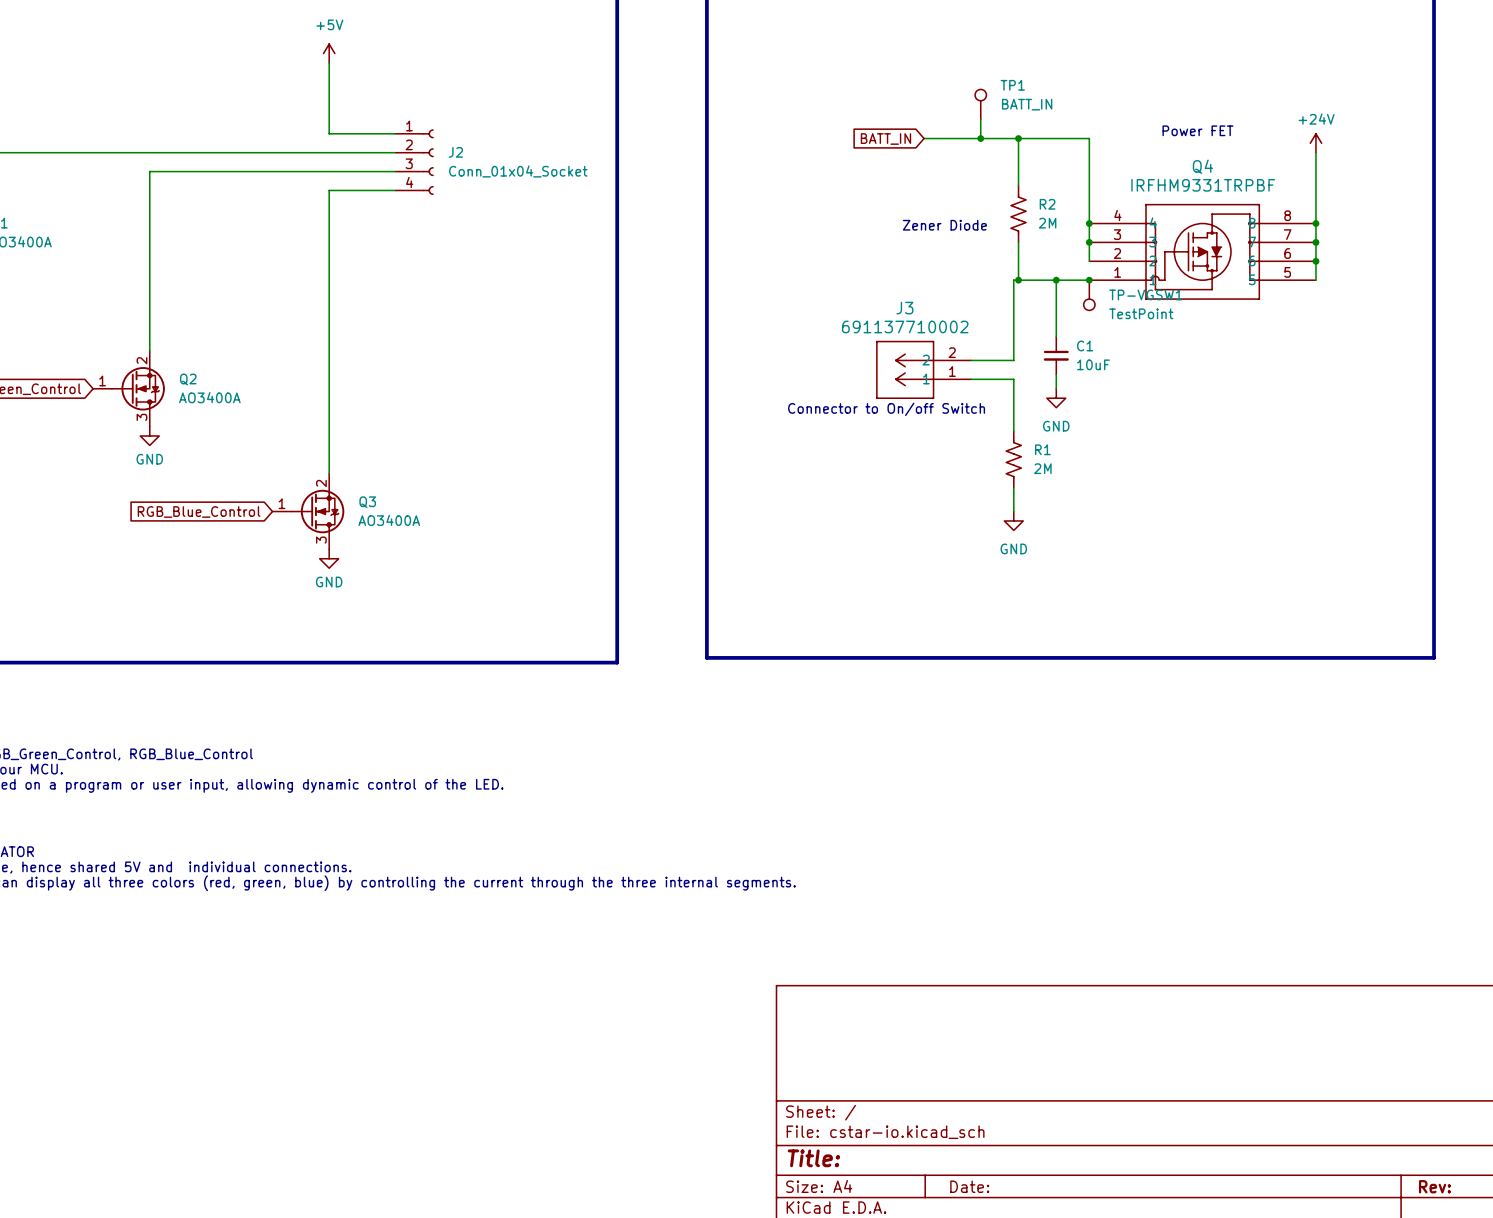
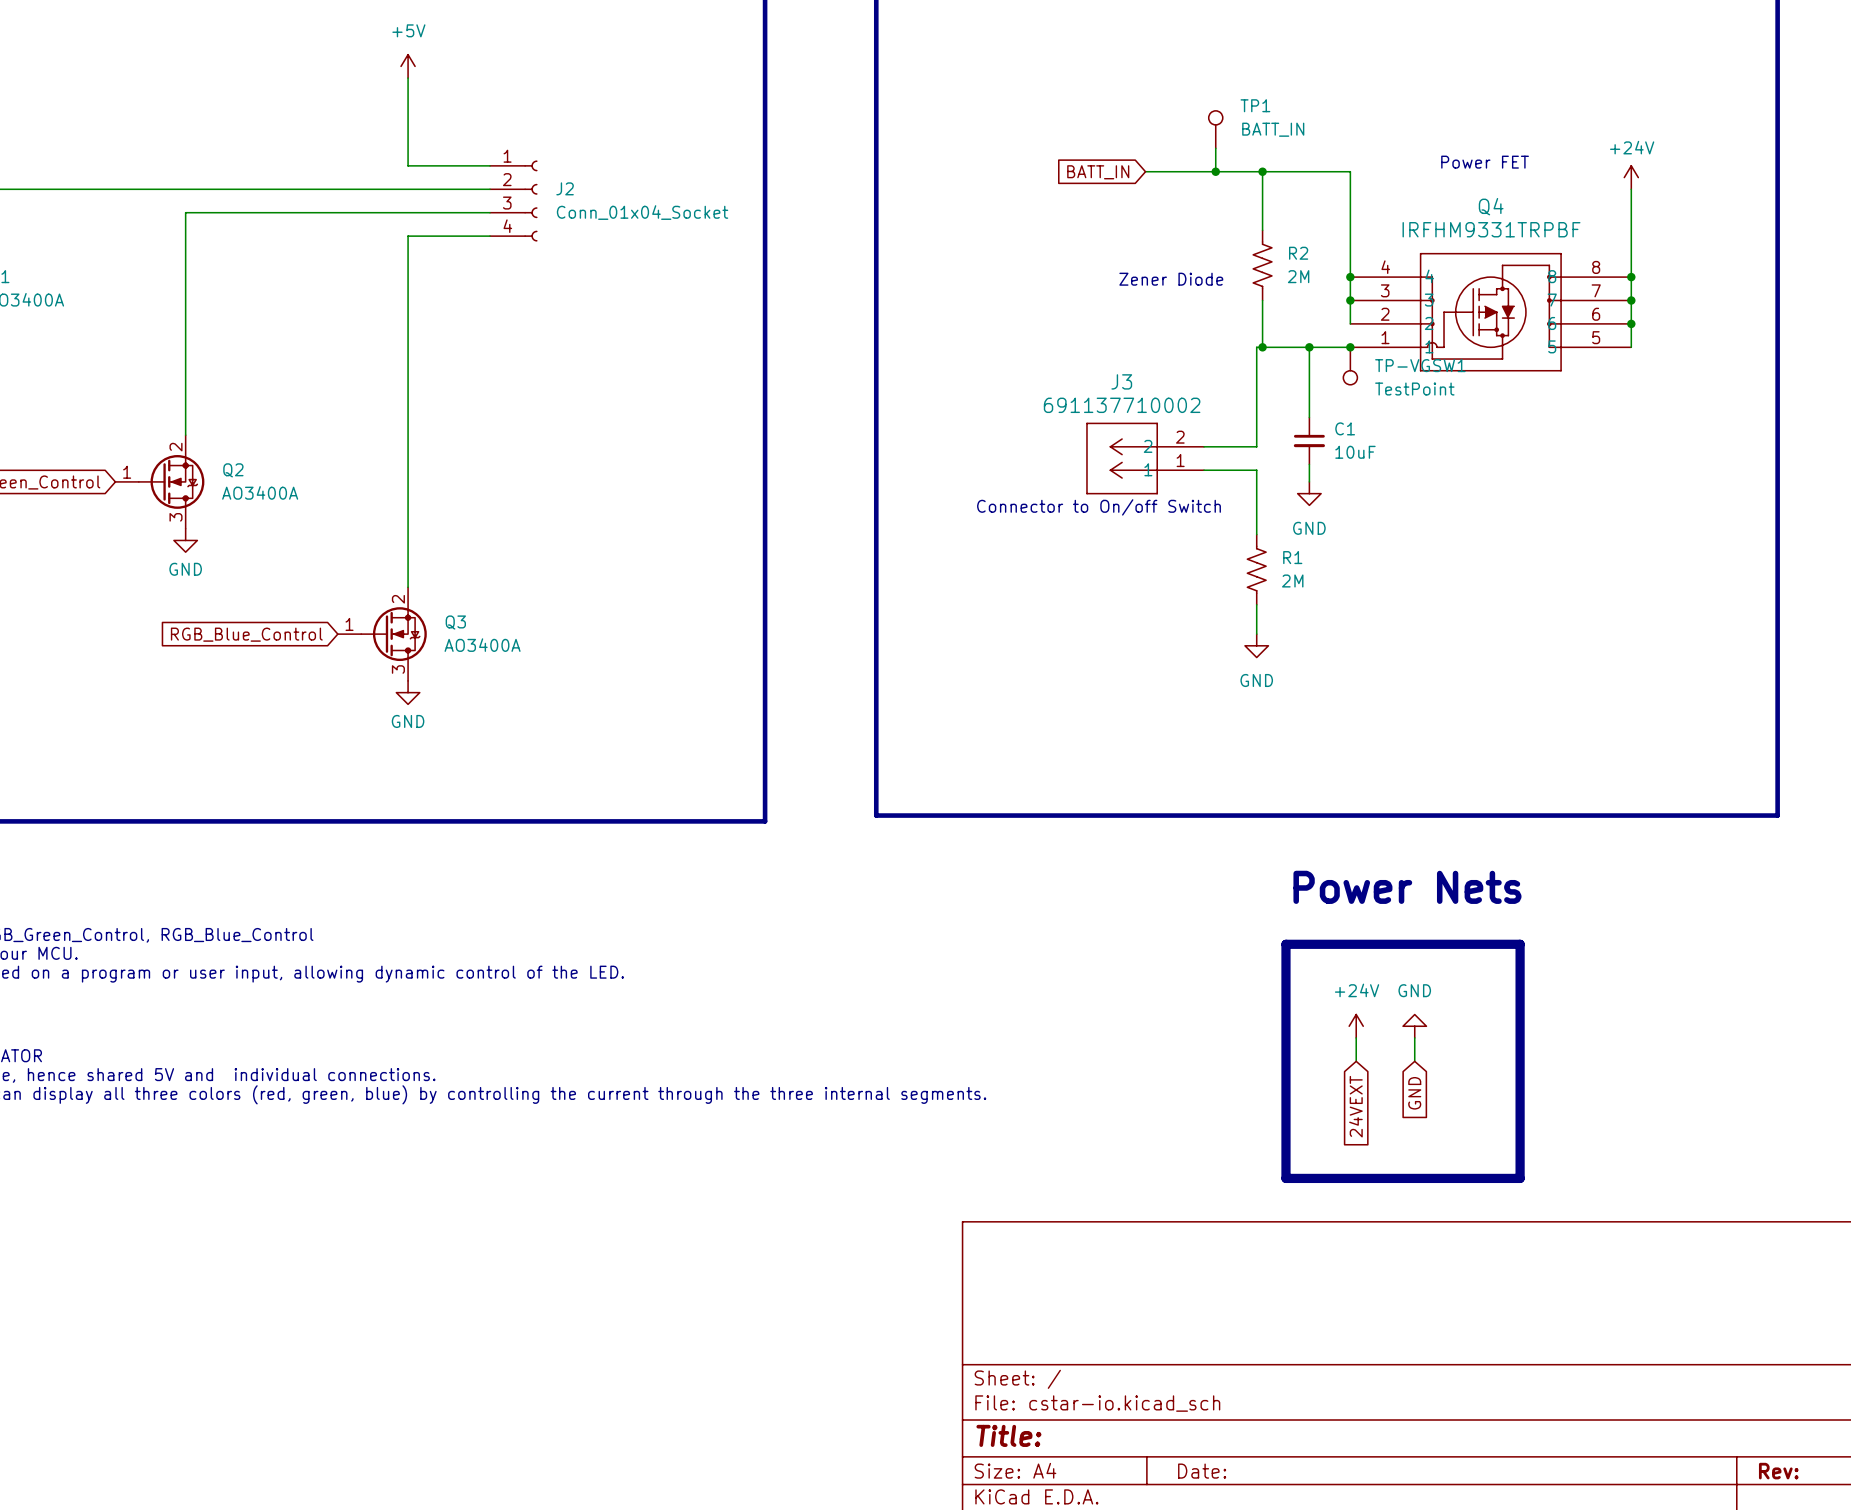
text: none -> Power Nets (1407, 887)
line: none -> (1285, 944) (1520, 944) (1520, 1178) (1285, 1178) (1285, 944)
power symbol: none -> +24V (1356, 1026)
power symbol: none -> GND (1414, 1026)
wire: none -> (1356, 1037) (1356, 1061)
wire: none -> (1414, 1037) (1414, 1061)
global label: none -> GND (1414, 1093)
global label: none -> 24VEXT (1355, 1106)

